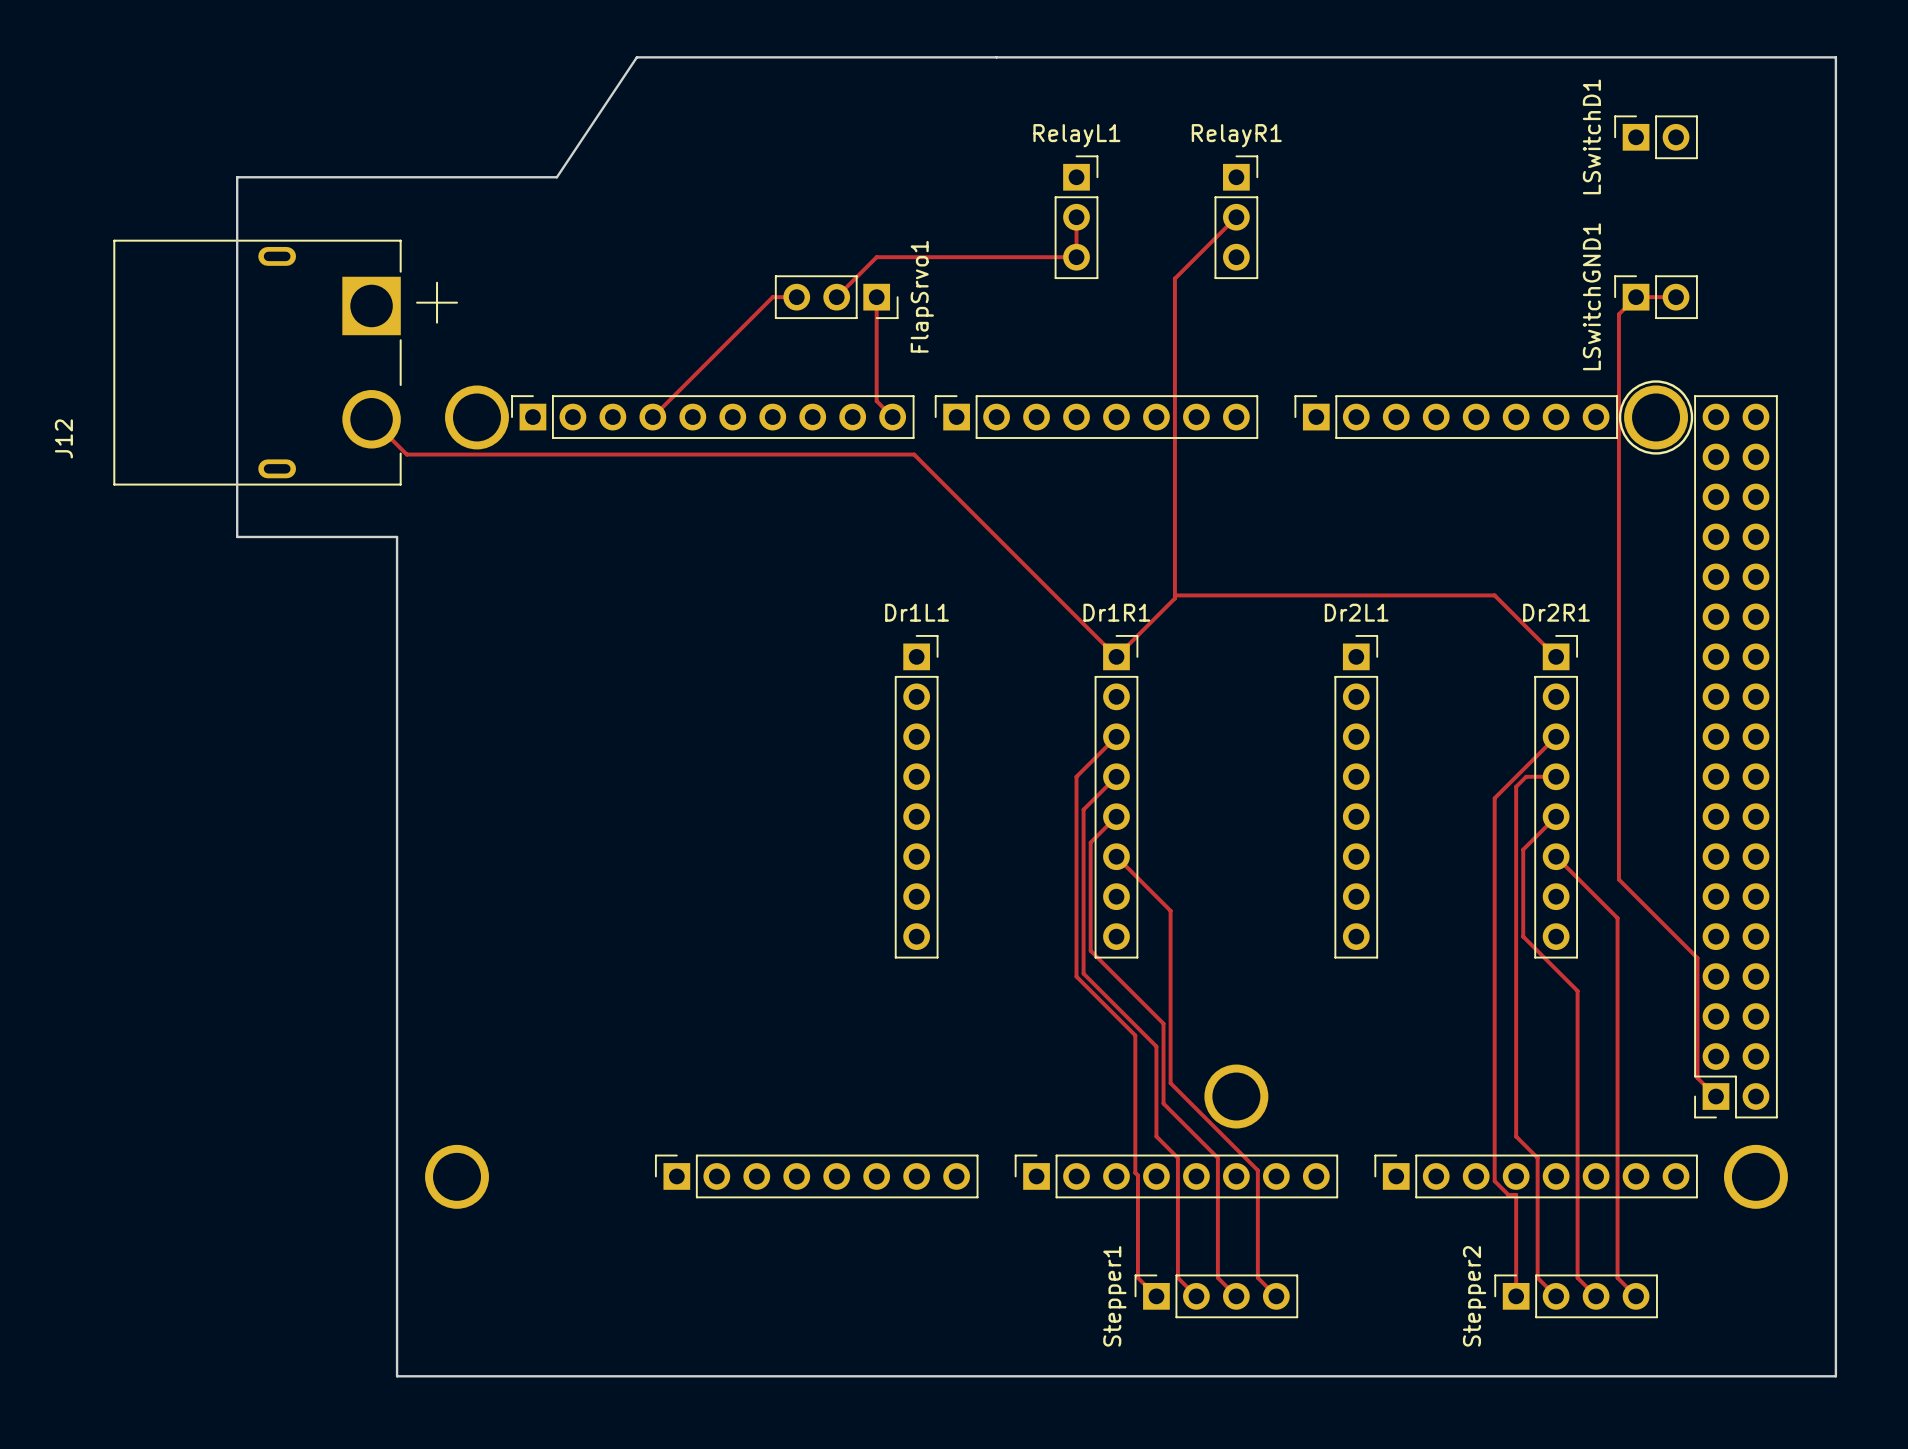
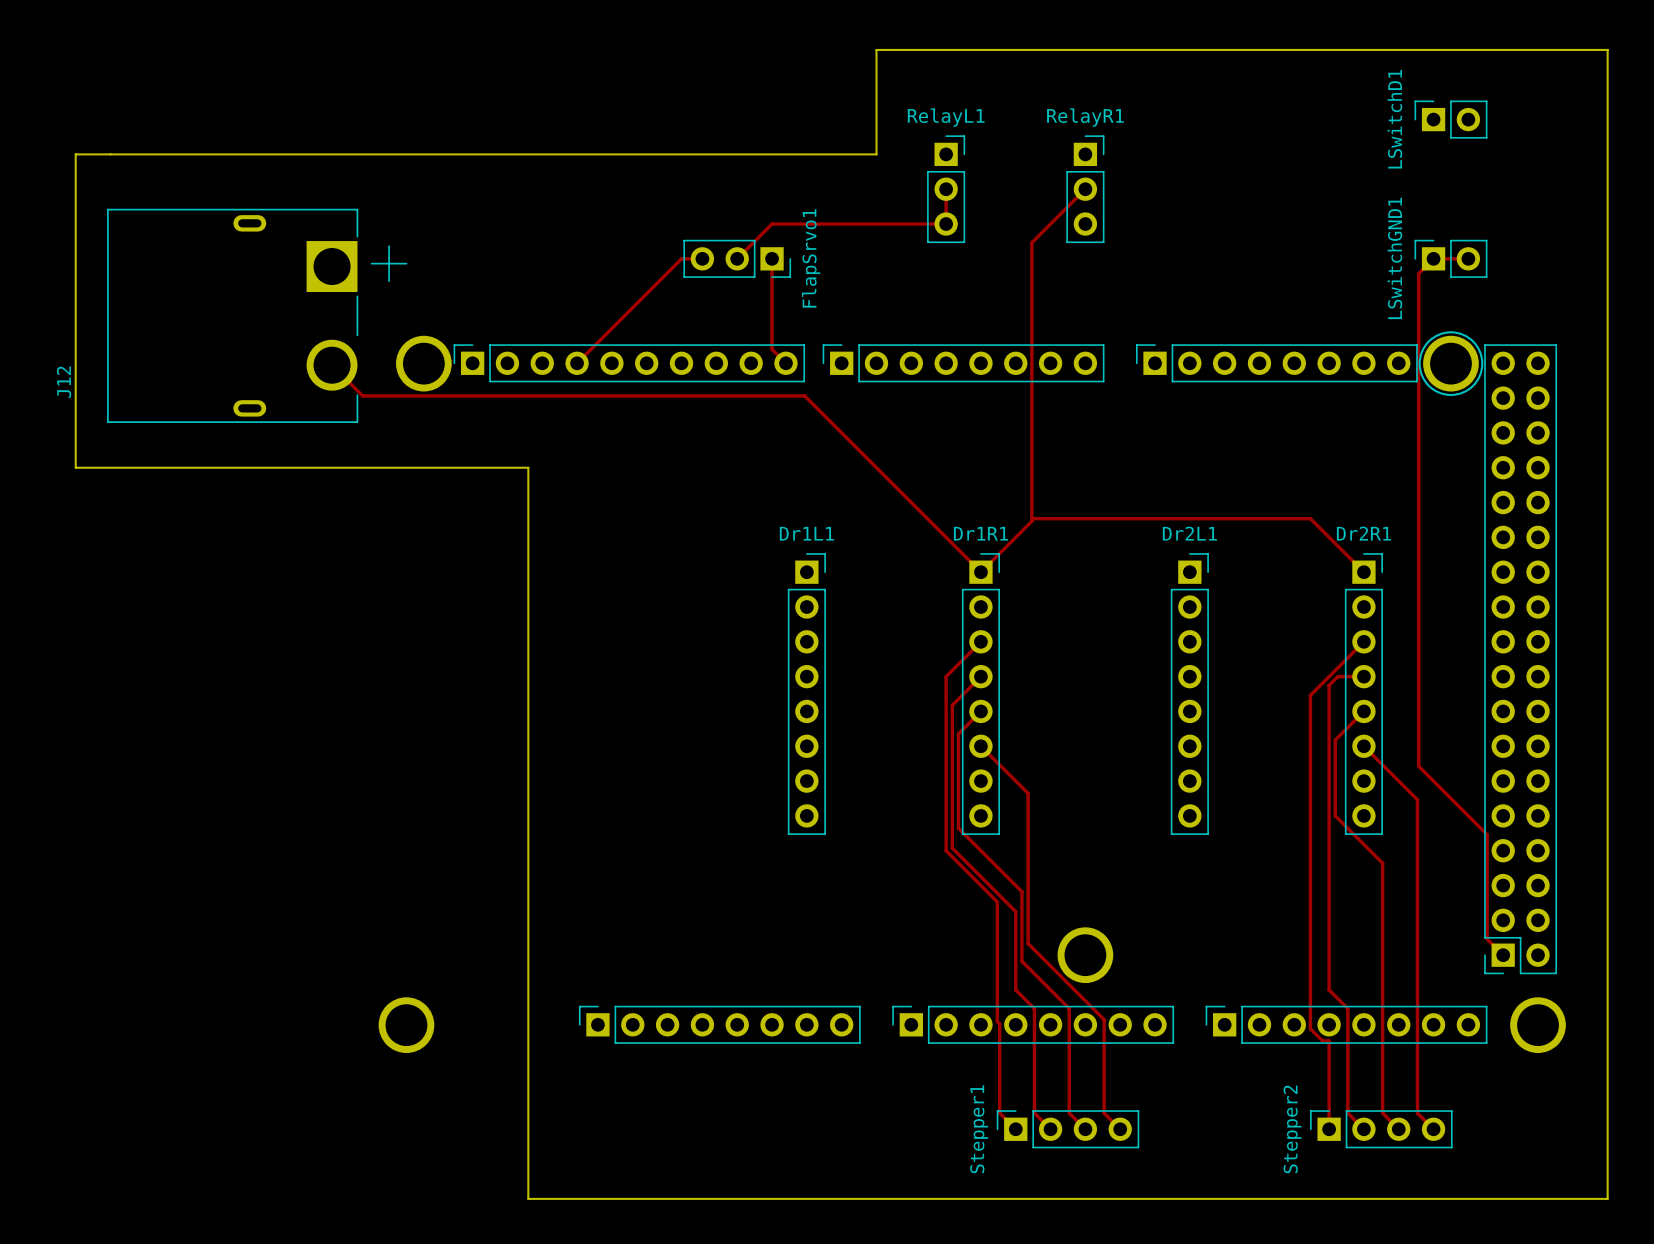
board edge: (996, 57) (636, 57) (556, 177) -> (876, 49) (876, 154) (493, 154)
board edge: (237, 177) (237, 536) -> (214, 154) (75, 154) (75, 467) (214, 467)
board edge: (397, 536) (397, 1376) (596, 1376) -> (354, 467) (528, 467) (528, 1198)

